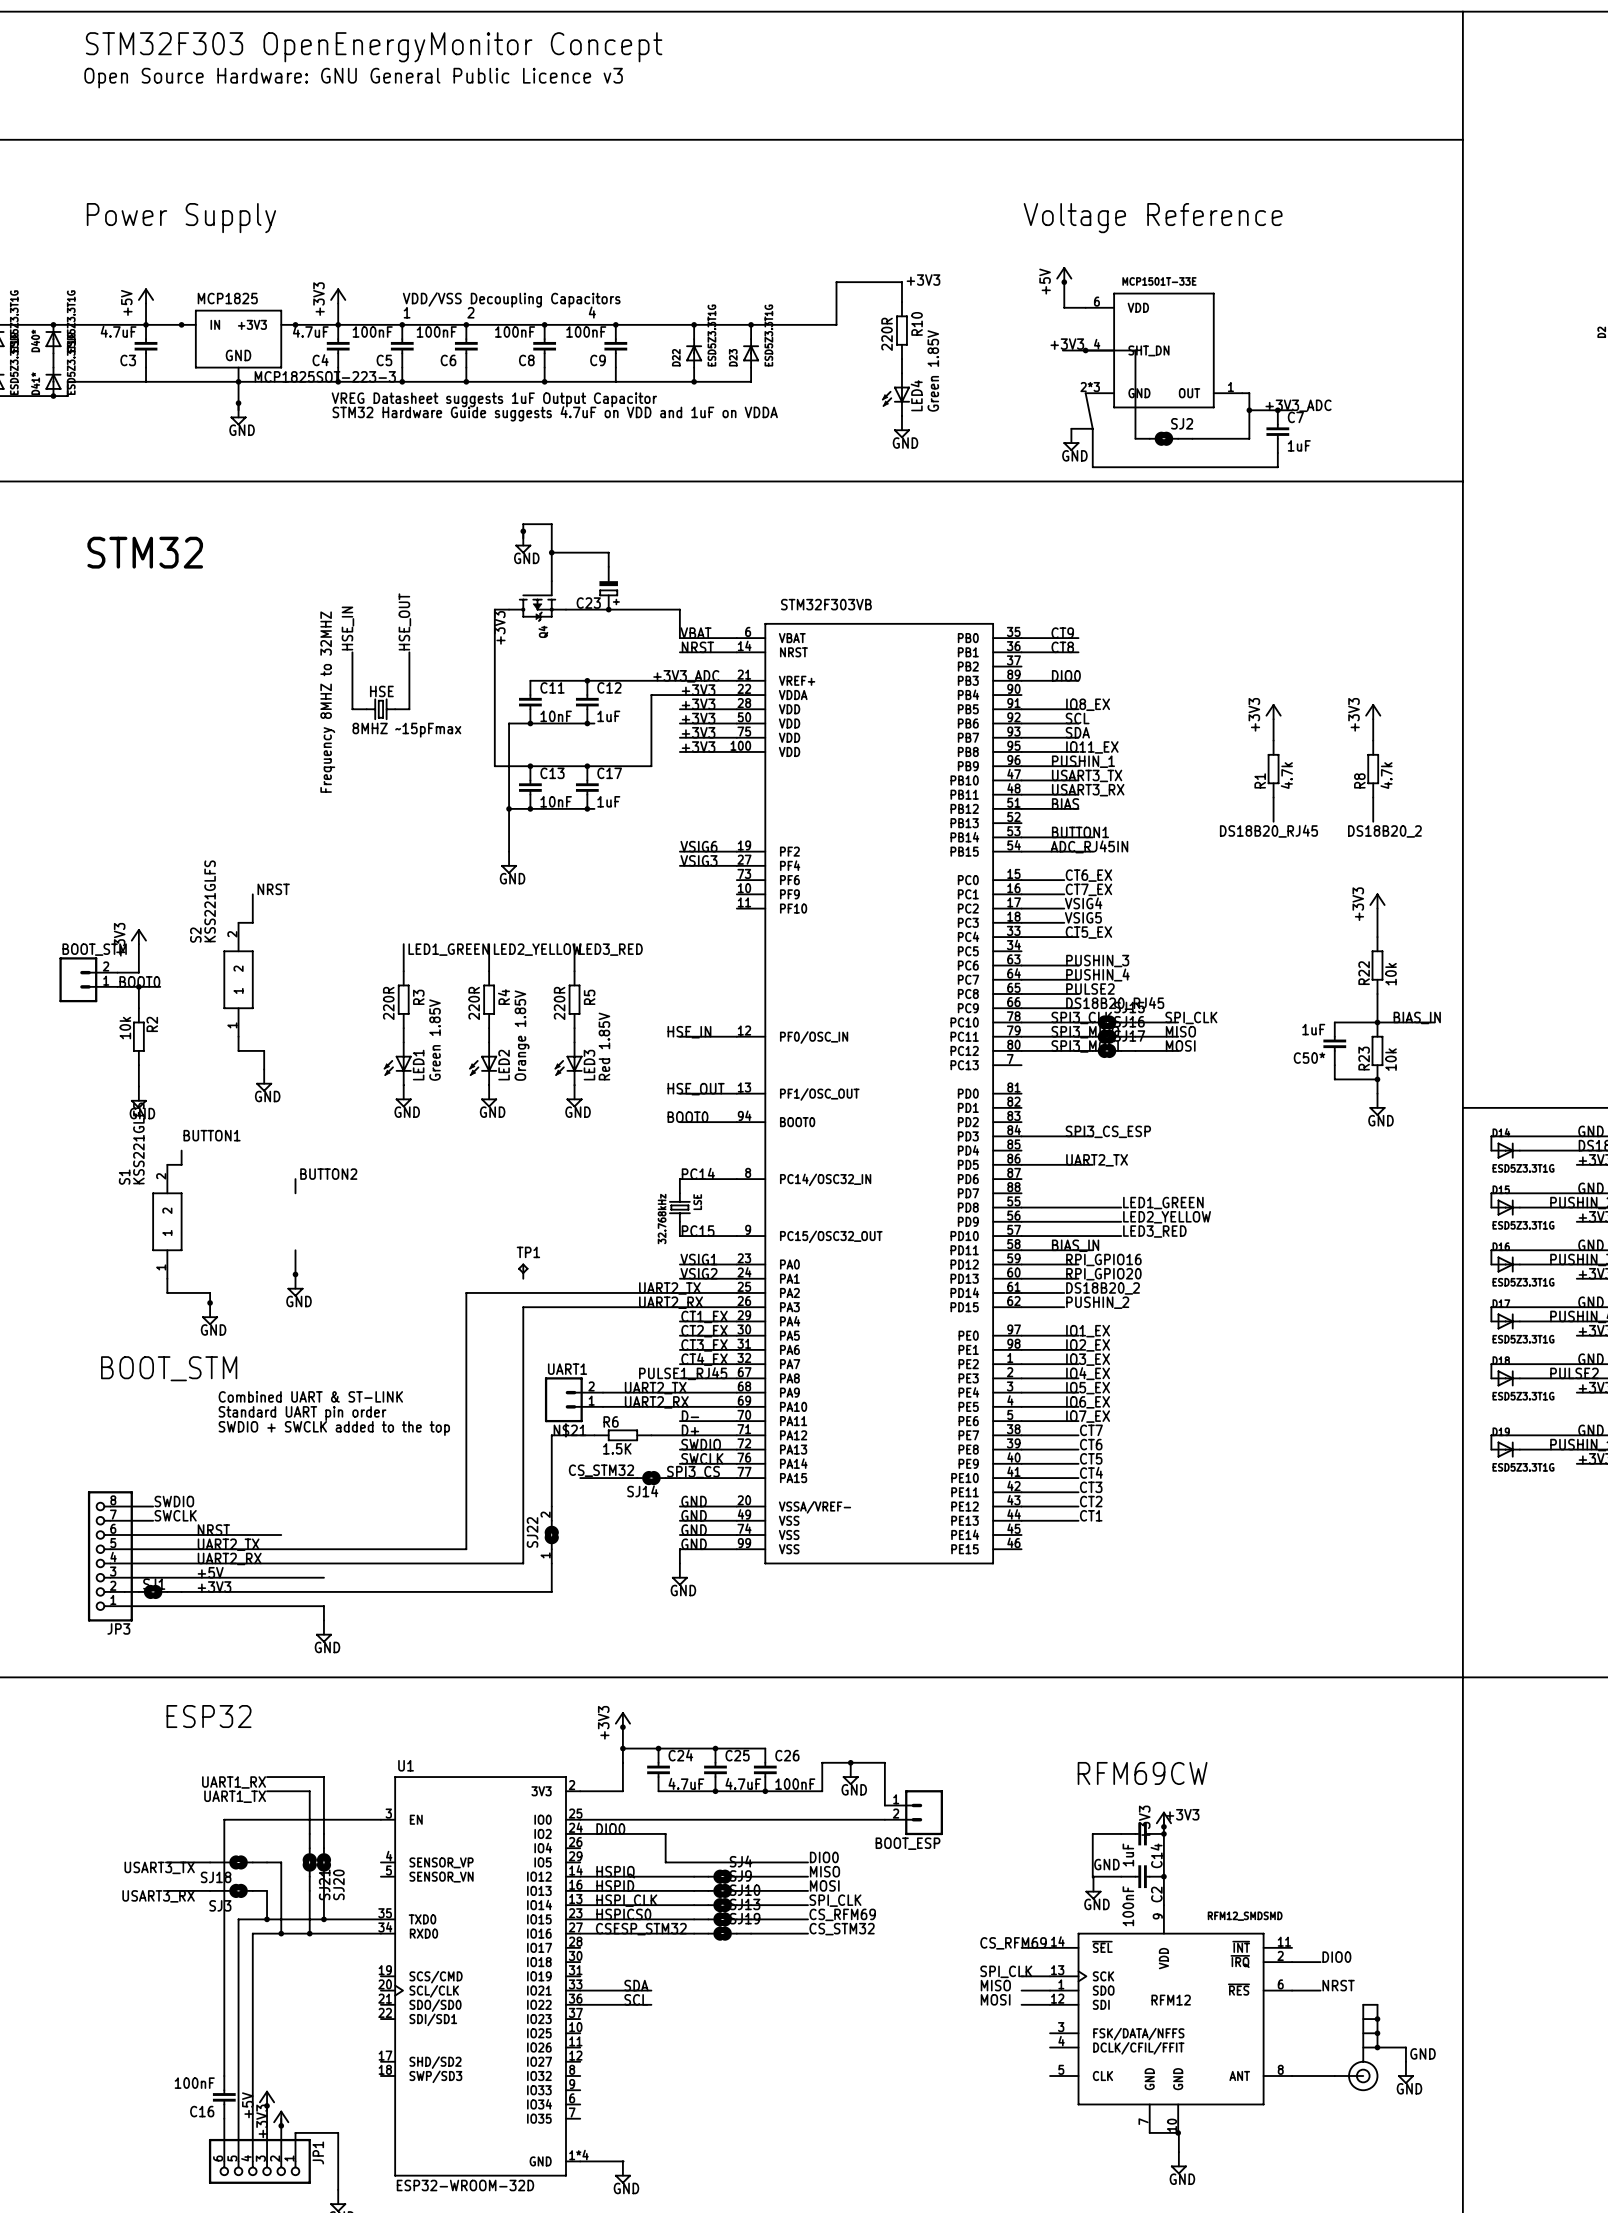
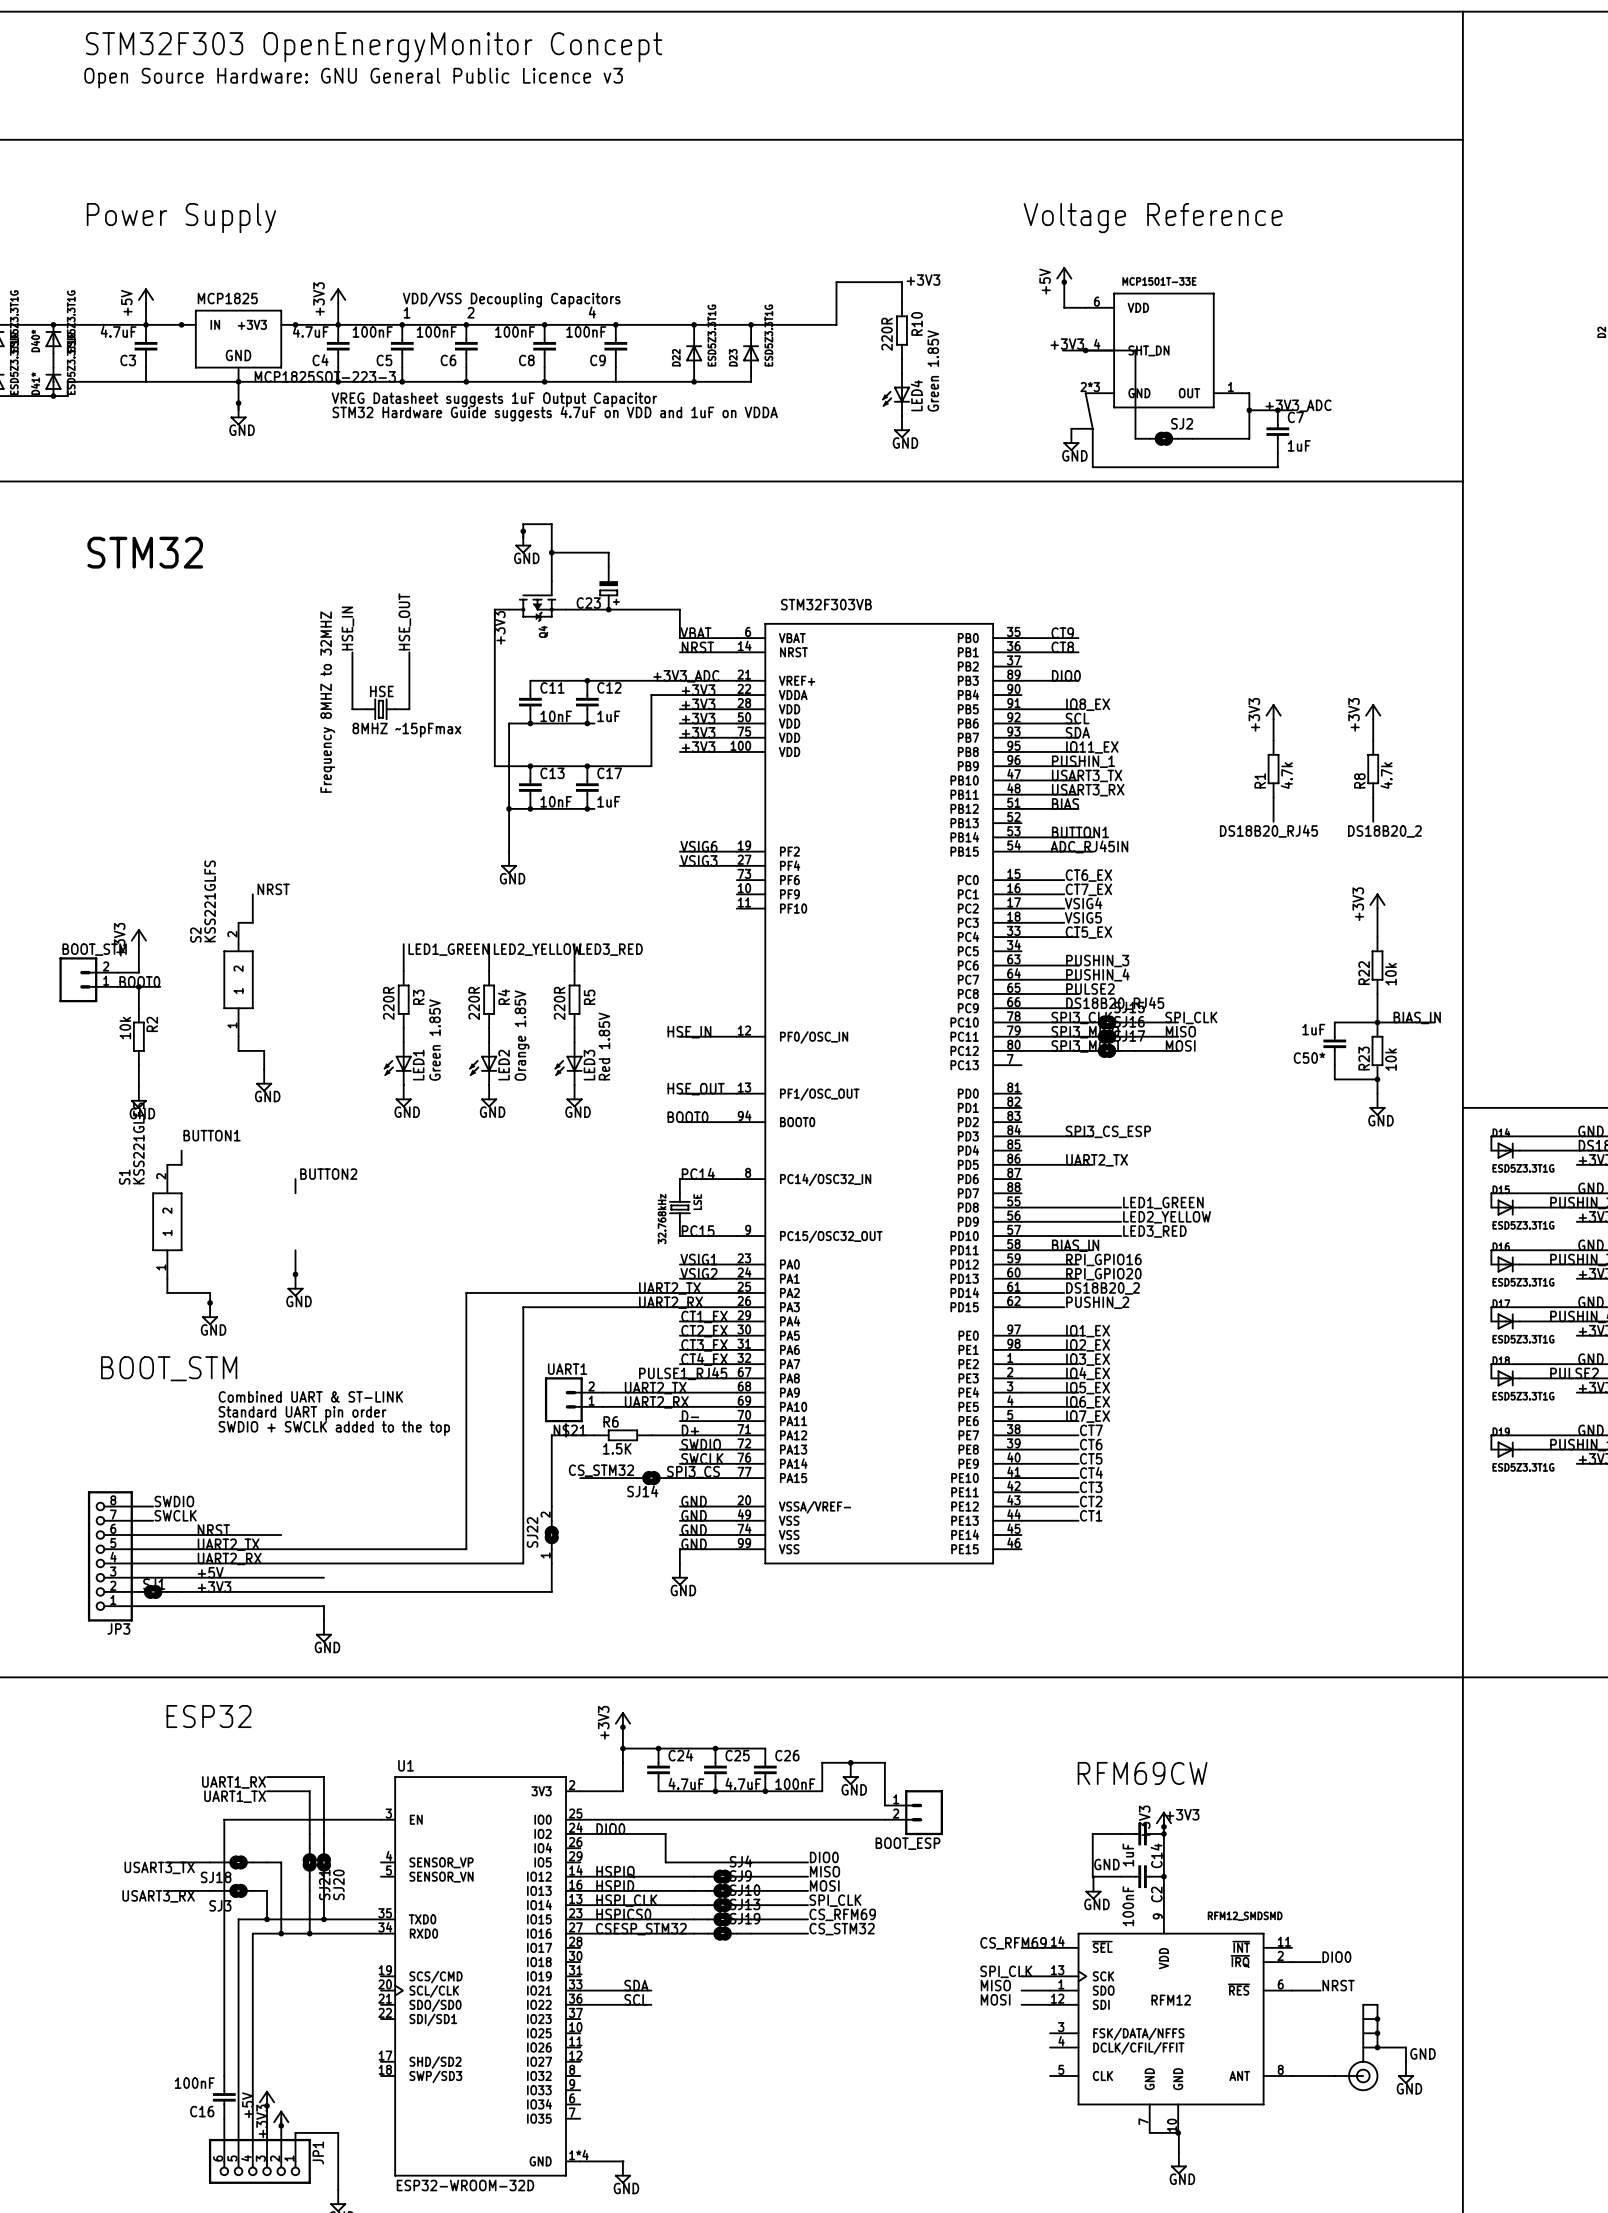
TP1: (523, 1271) -> none

